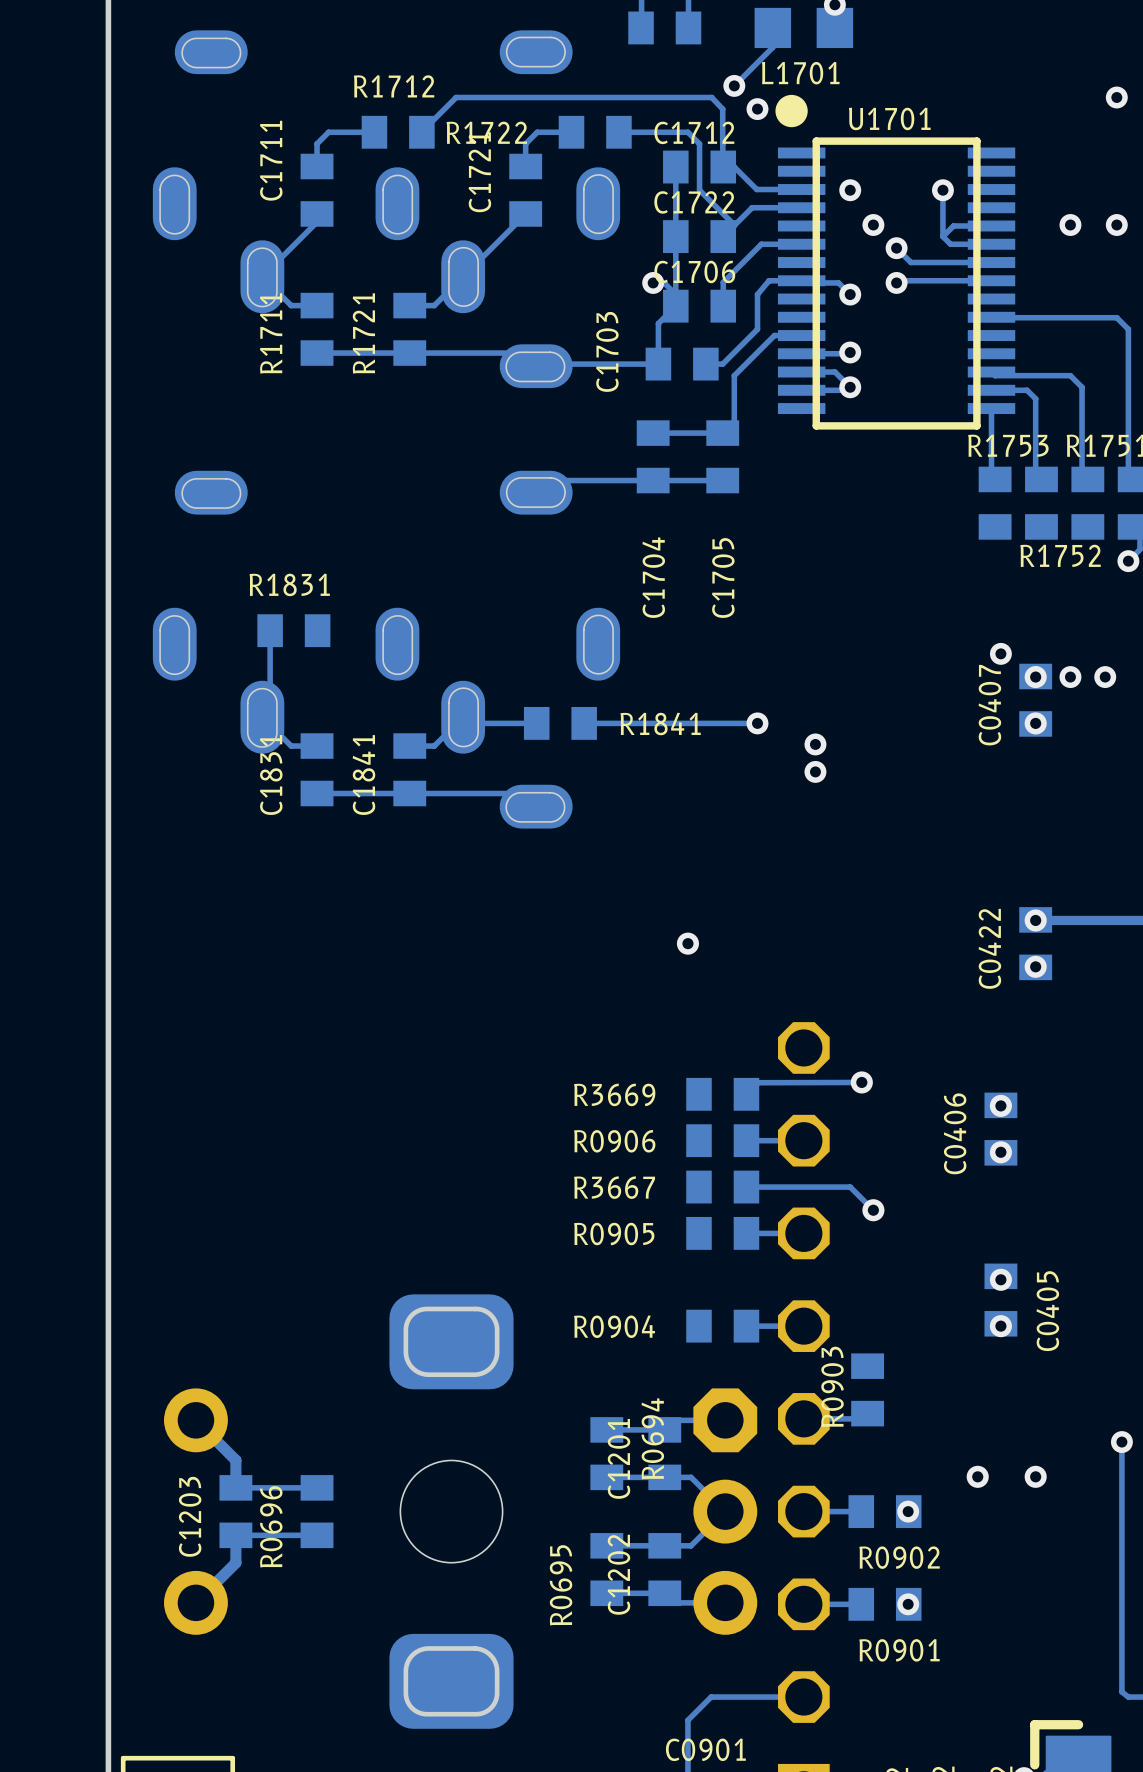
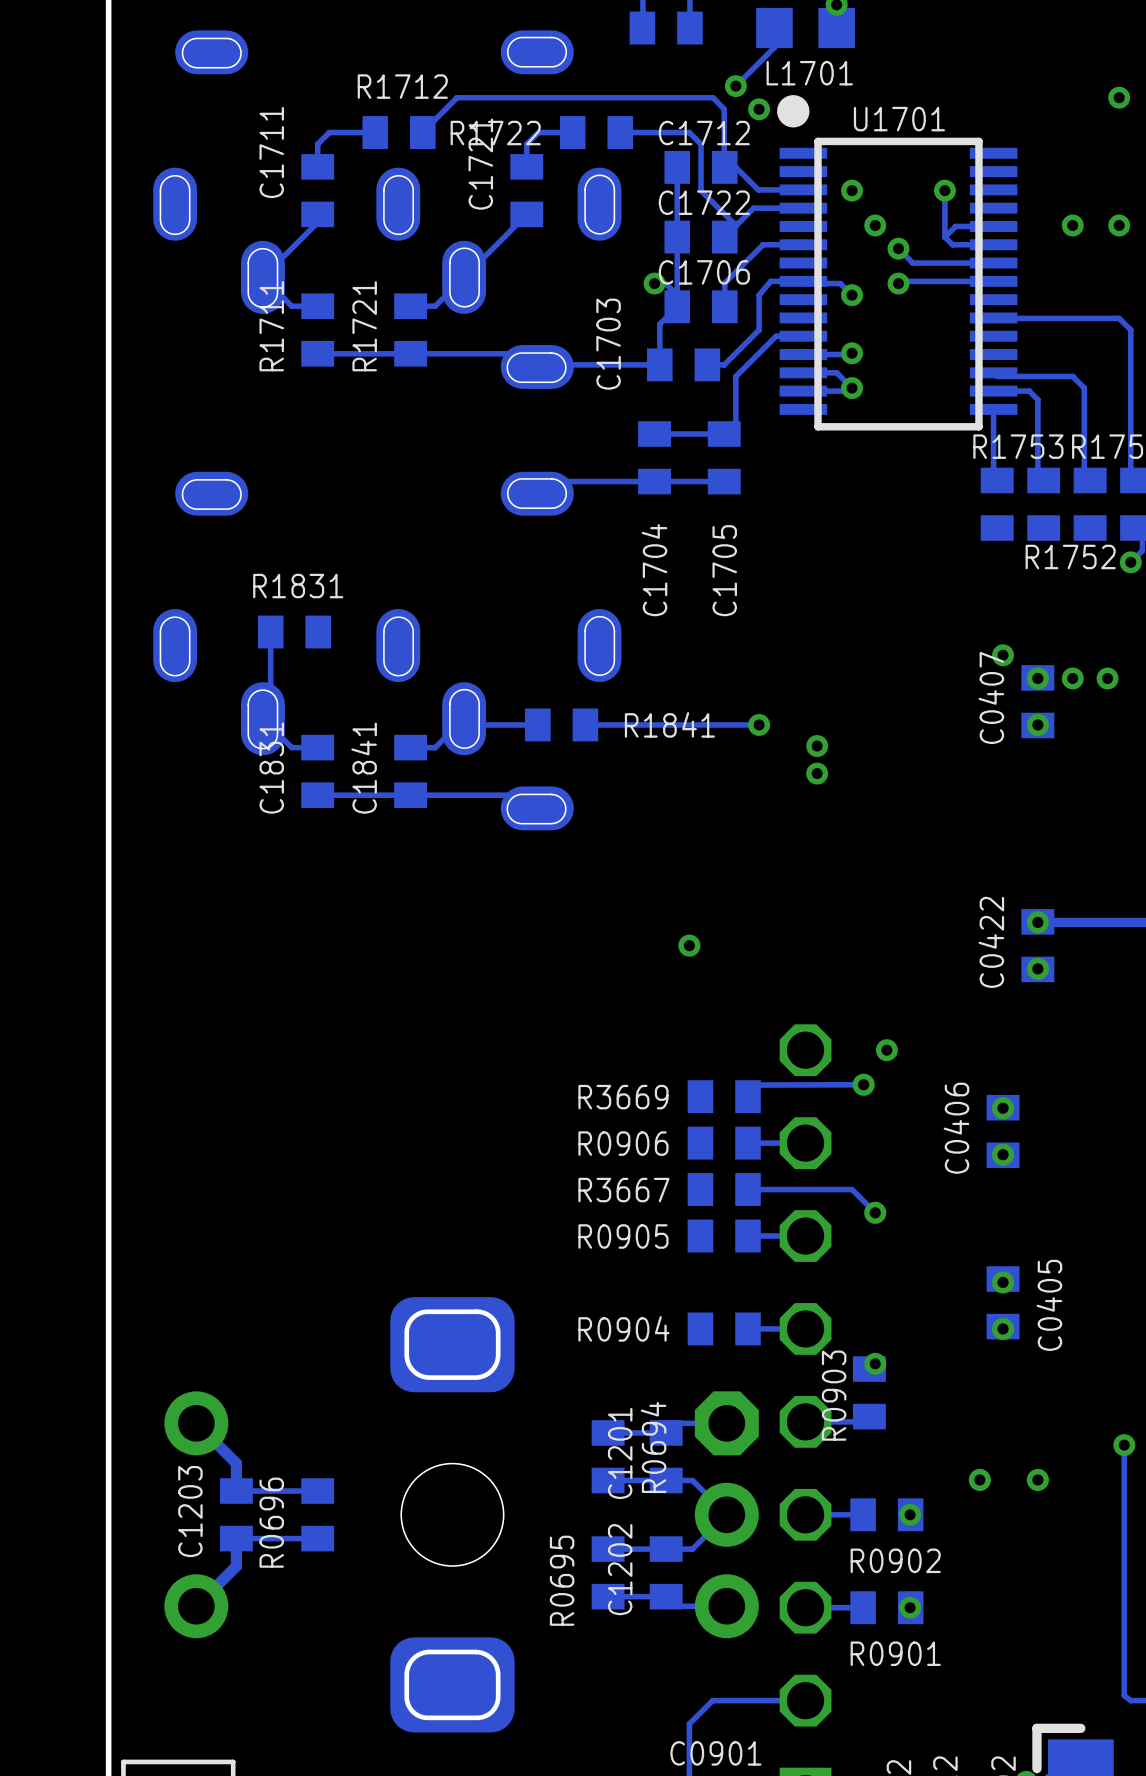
via: none -> (886, 1050)
via: none -> (875, 1363)

